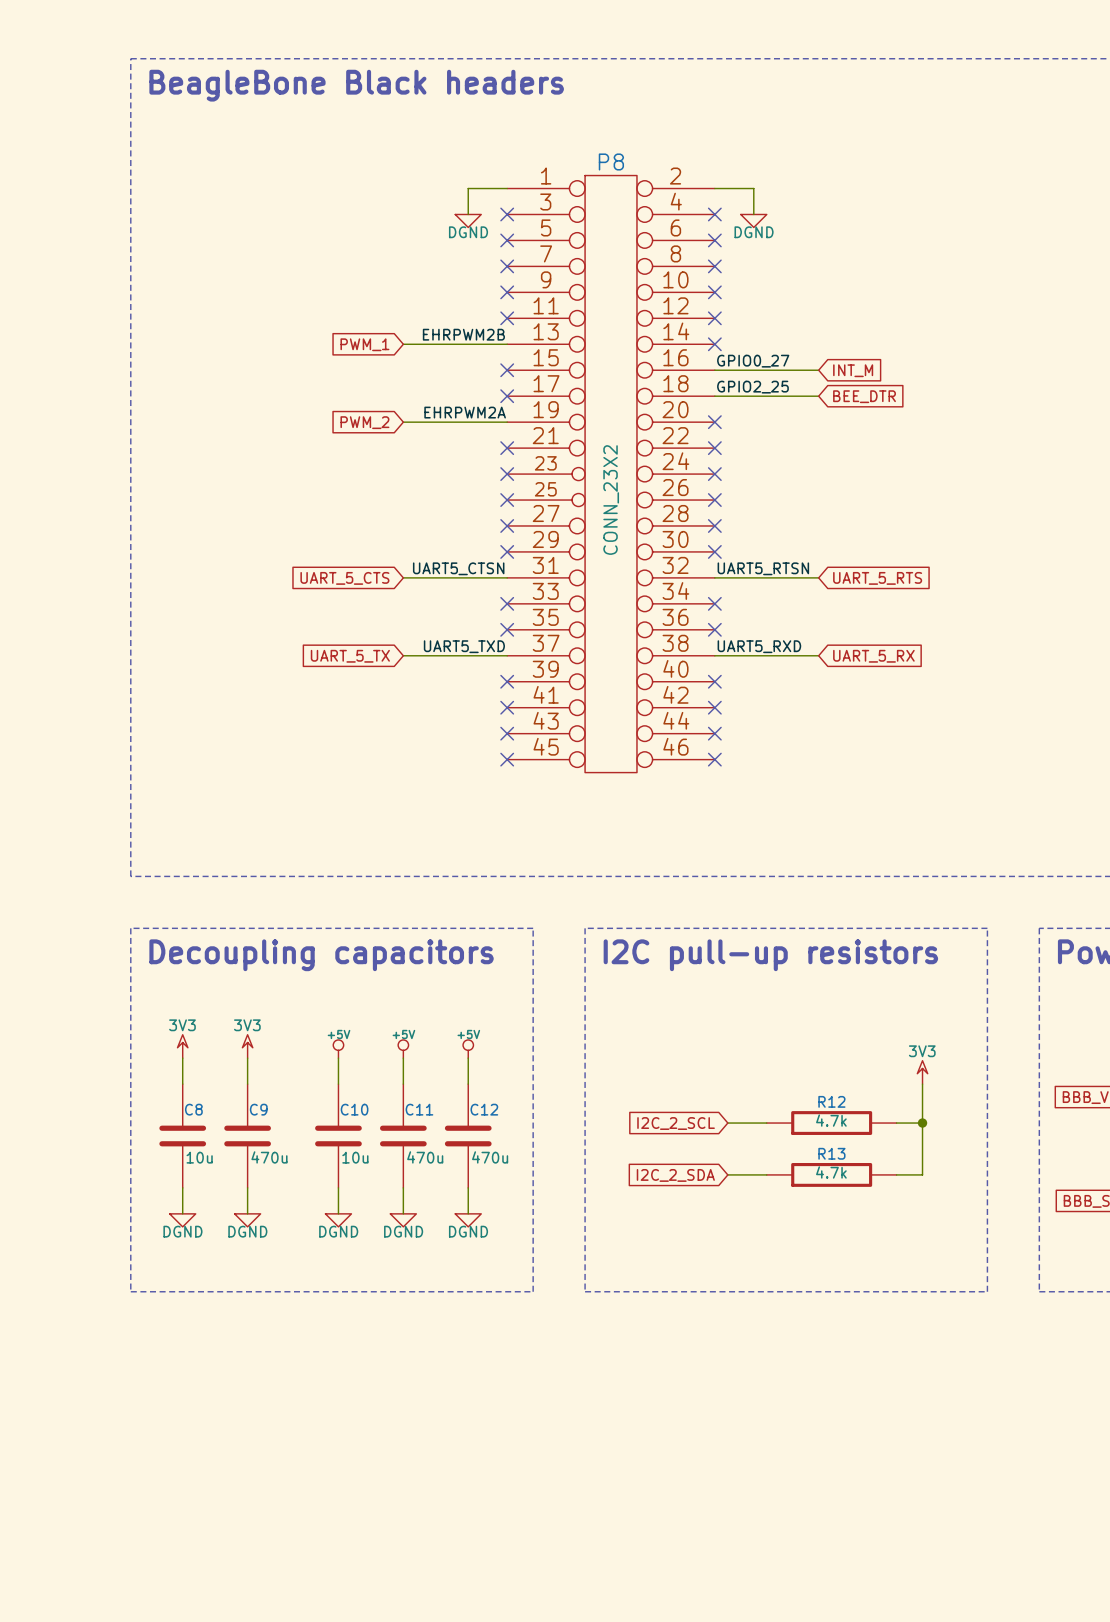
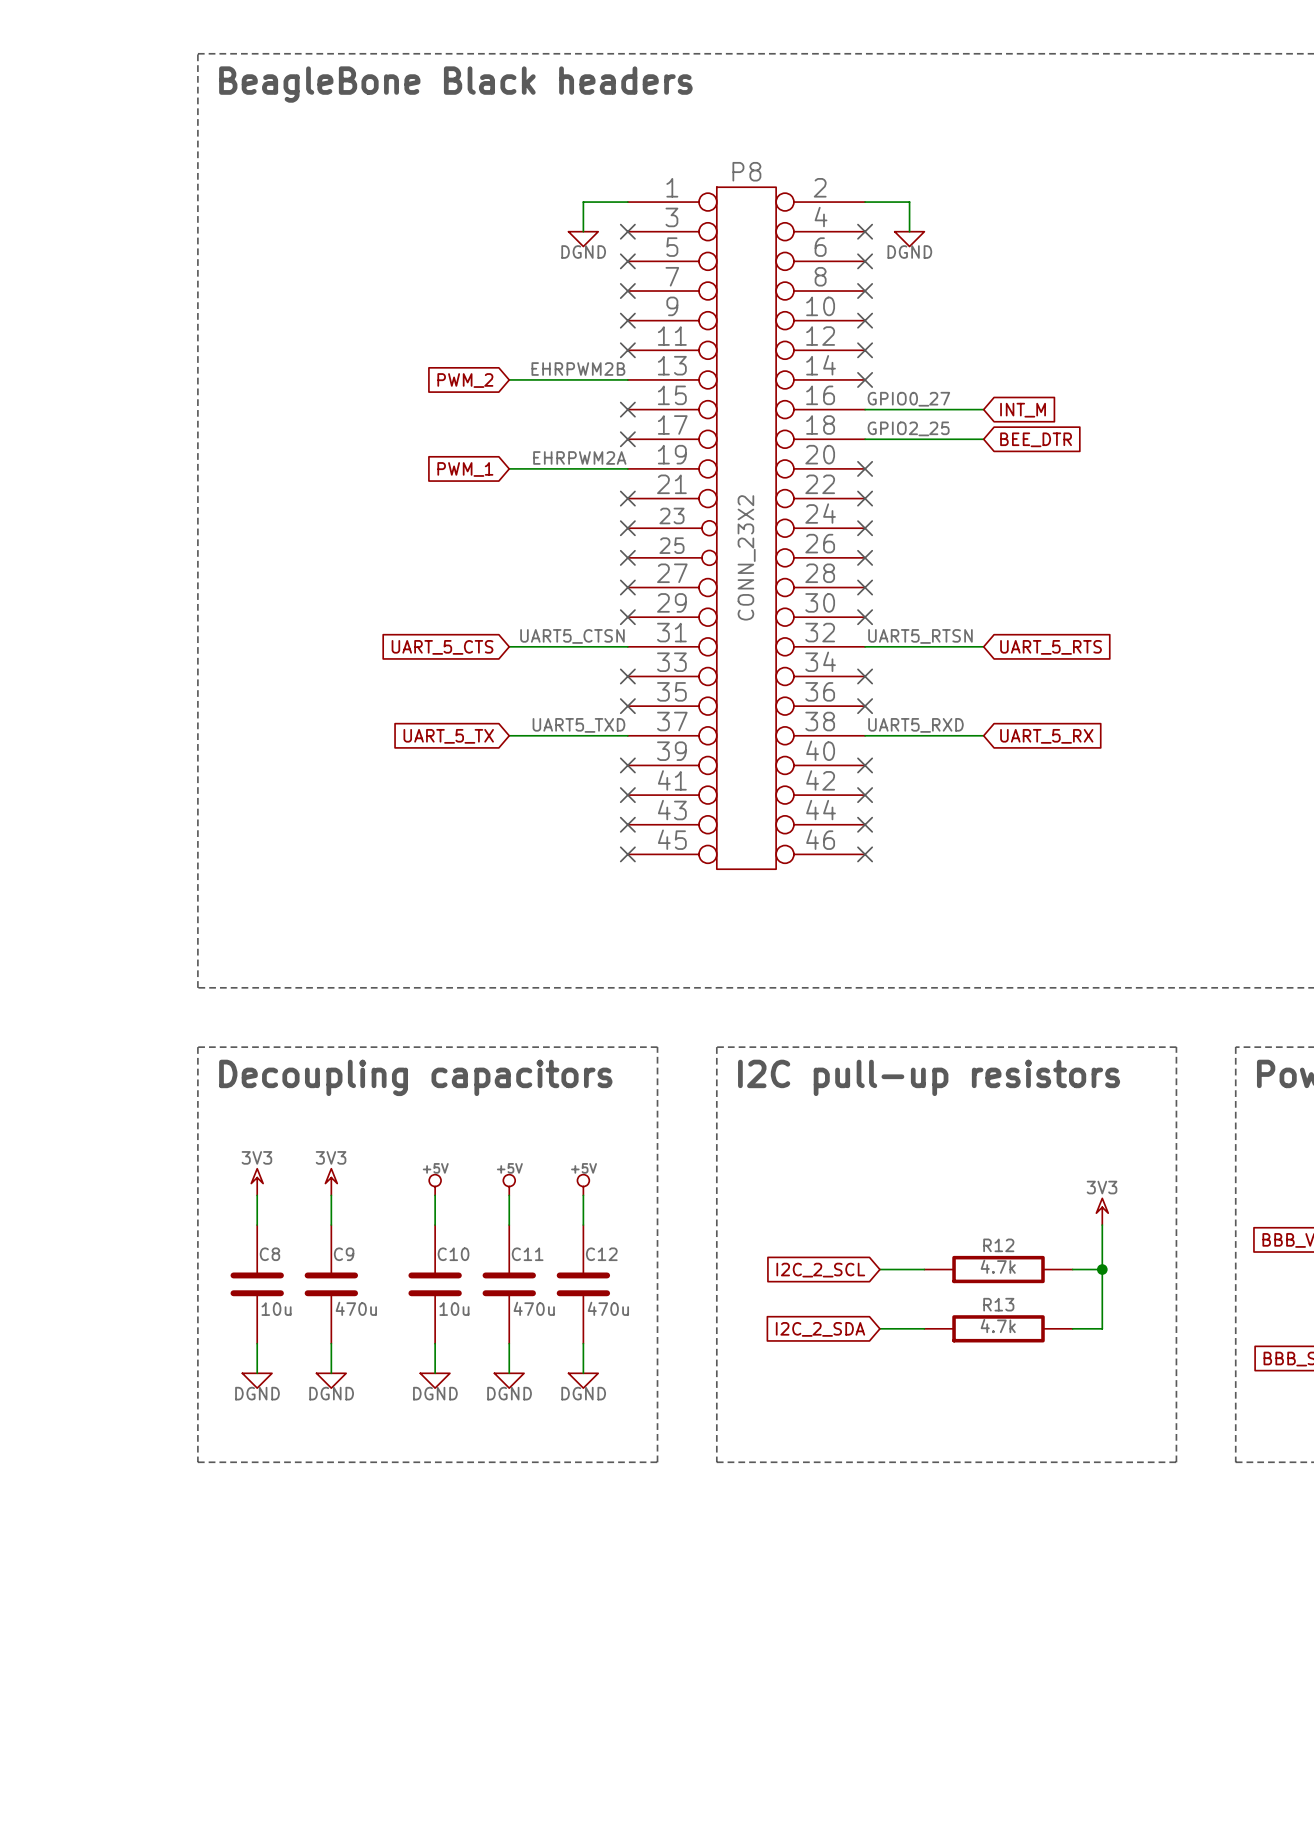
global label: PWM_1 (364, 344) -> PWM_2 (465, 380)
global label: PWM_2 (364, 422) -> PWM_1 (465, 469)

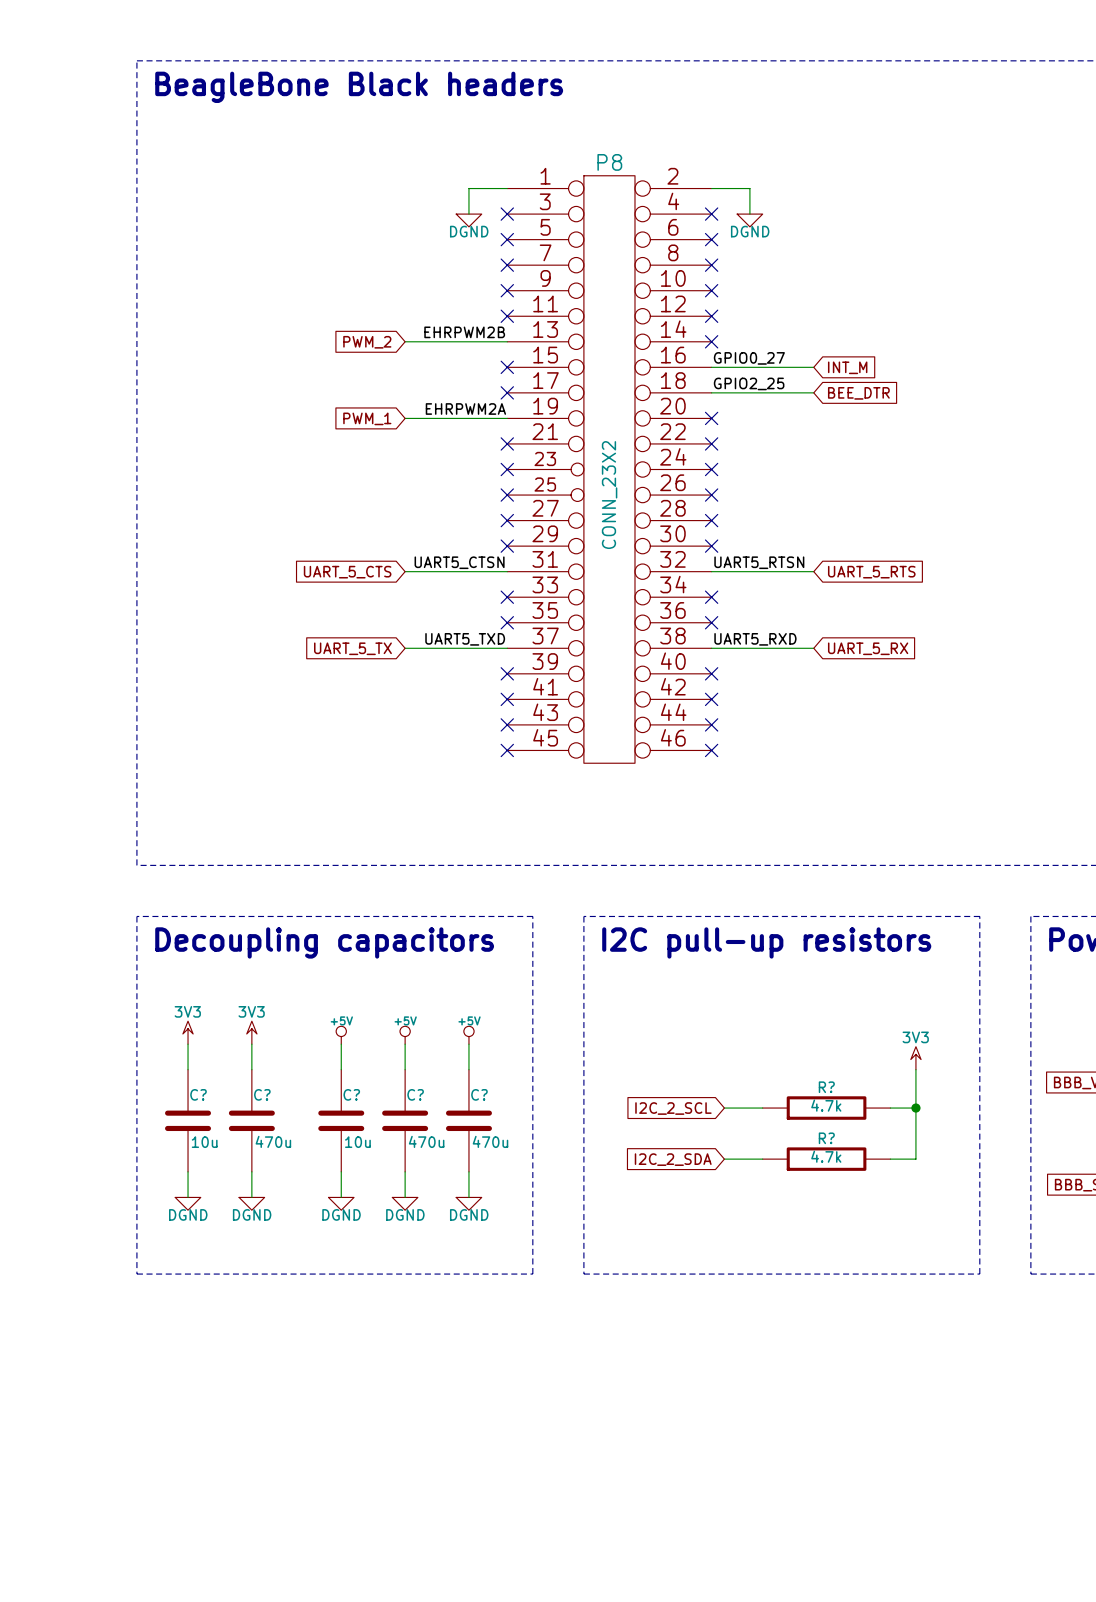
R12 name: R12 (998, 1245) -> R? (826, 1087)
C8 name: C8 (269, 1254) -> C? (198, 1094)
C9 name: C9 (344, 1254) -> C? (262, 1094)
C10 name: C10 (453, 1254) -> C? (351, 1094)
C11 name: C11 (527, 1254) -> C? (415, 1094)
C12 name: C12 (601, 1254) -> C? (479, 1094)
R13 name: R13 (998, 1304) -> R? (826, 1138)

